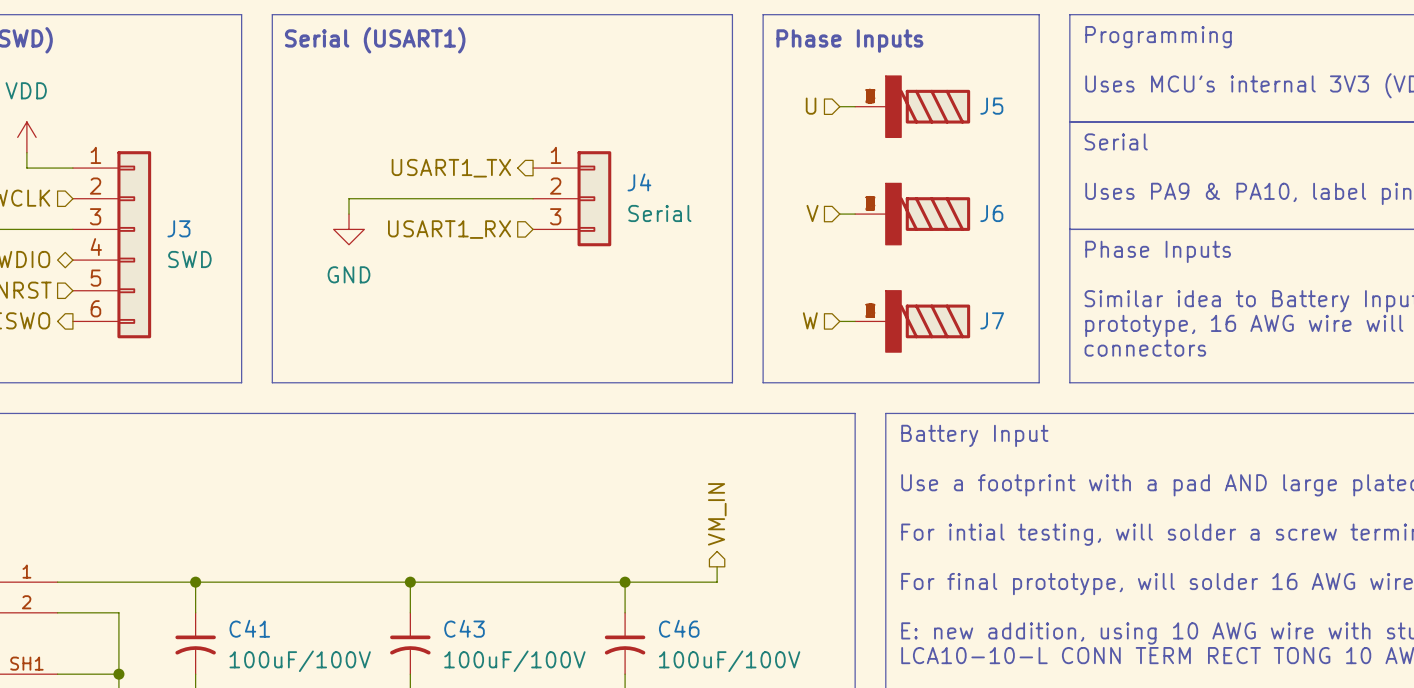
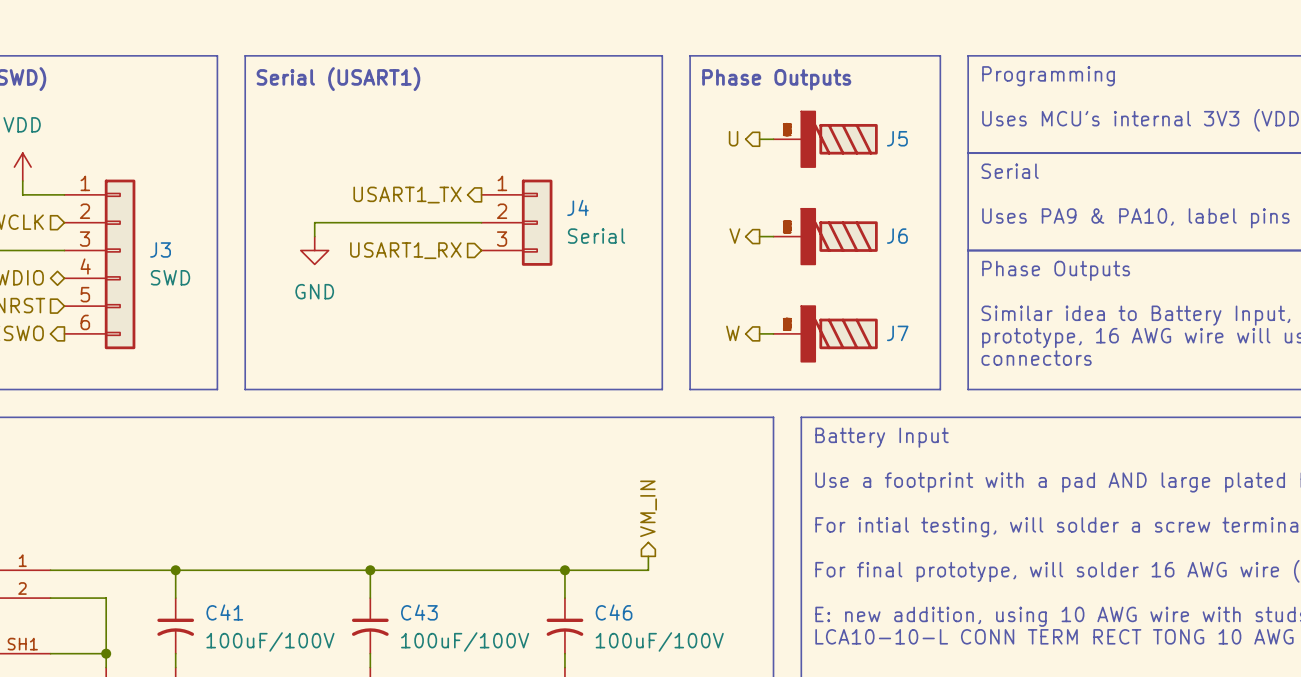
text: Phase Inputs (849, 41) -> Phase Outputs (776, 79)
hierarchical label shape: input (811, 106) -> output (733, 138)
hierarchical label shape: input (812, 213) -> output (734, 236)
text: Phase Inputs (1158, 251) -> Phase Outputs (1056, 270)
hierarchical label shape: input (810, 320) -> output (732, 333)

